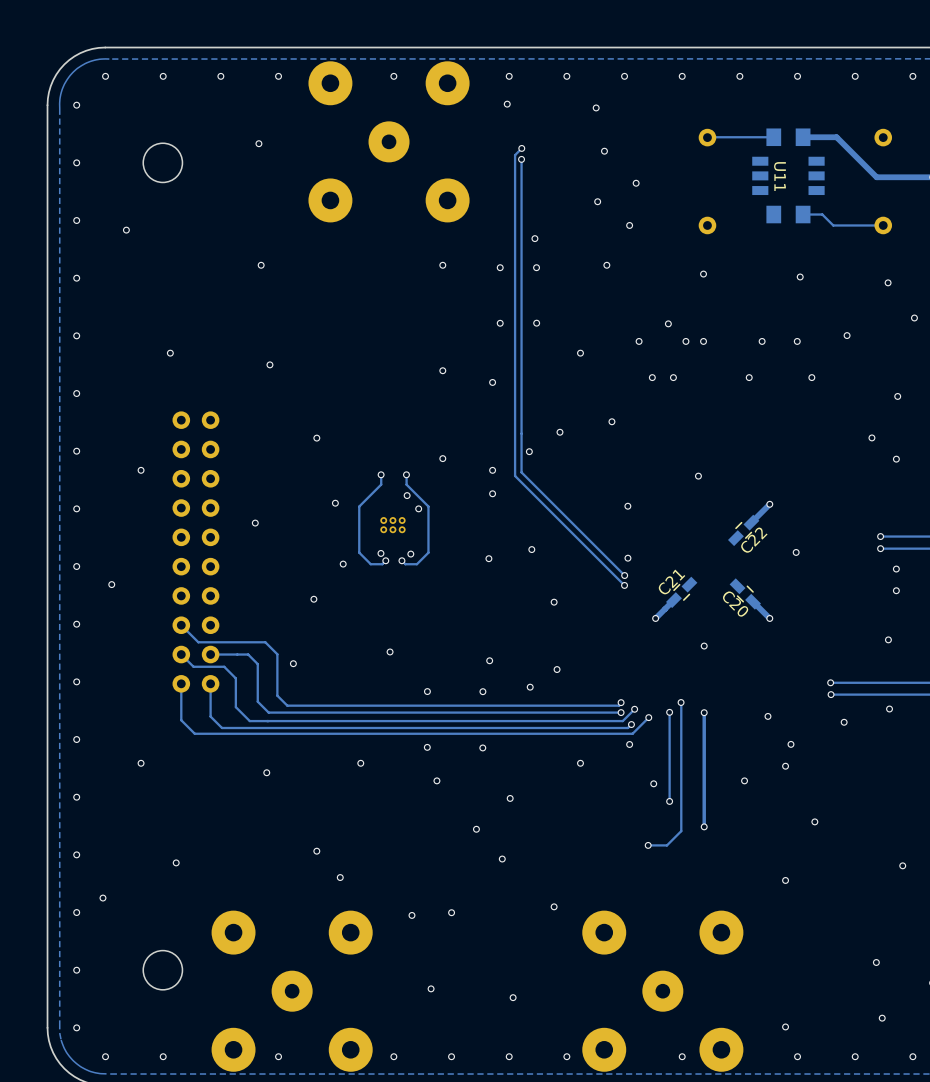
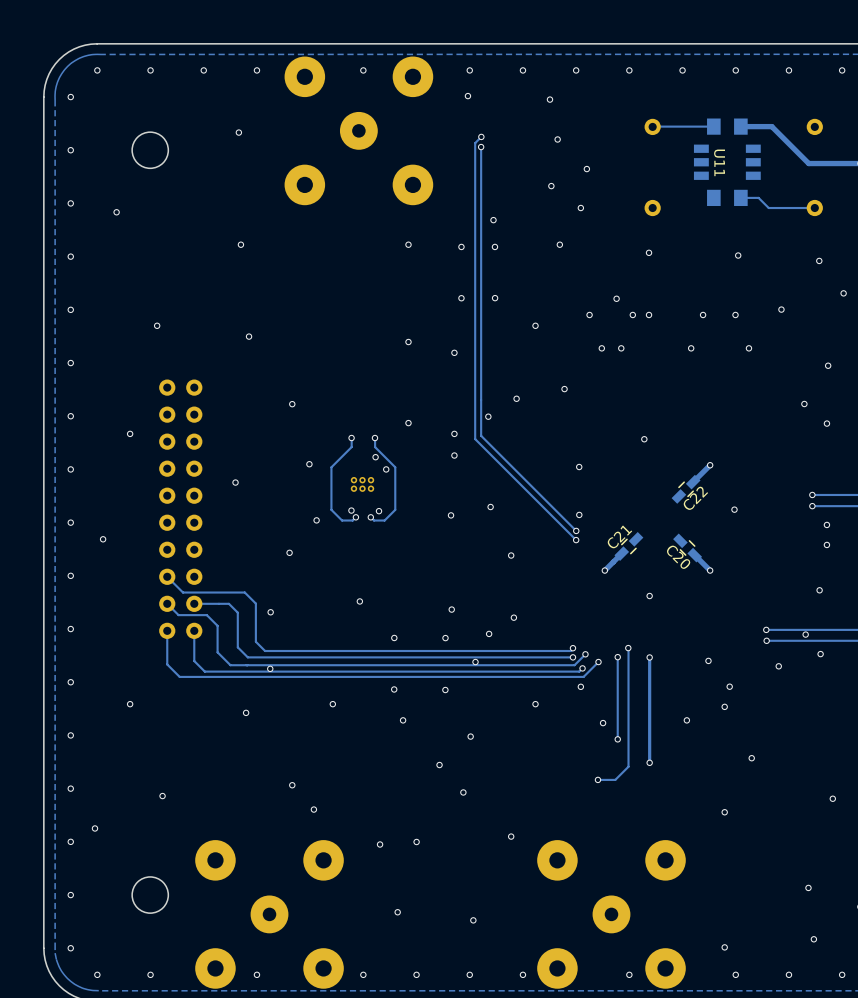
via: none -> (805, 634)
via: none -> (475, 662)
via: none -> (270, 668)

